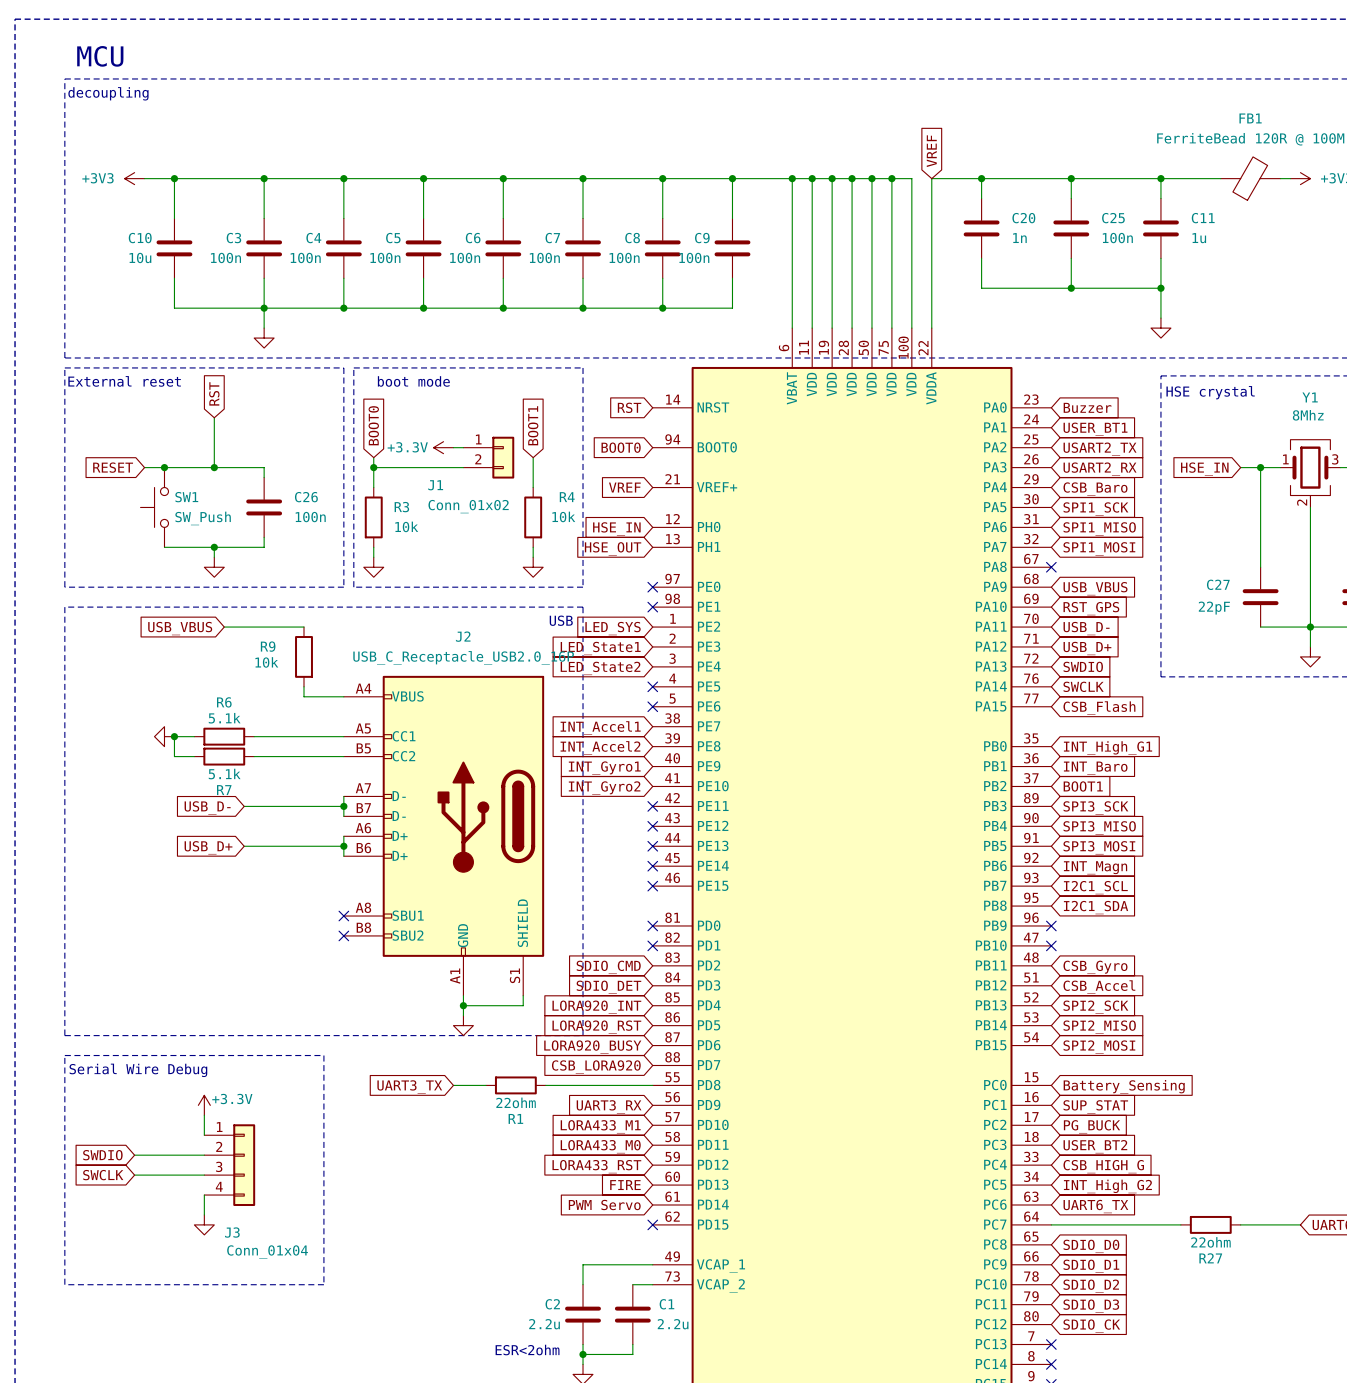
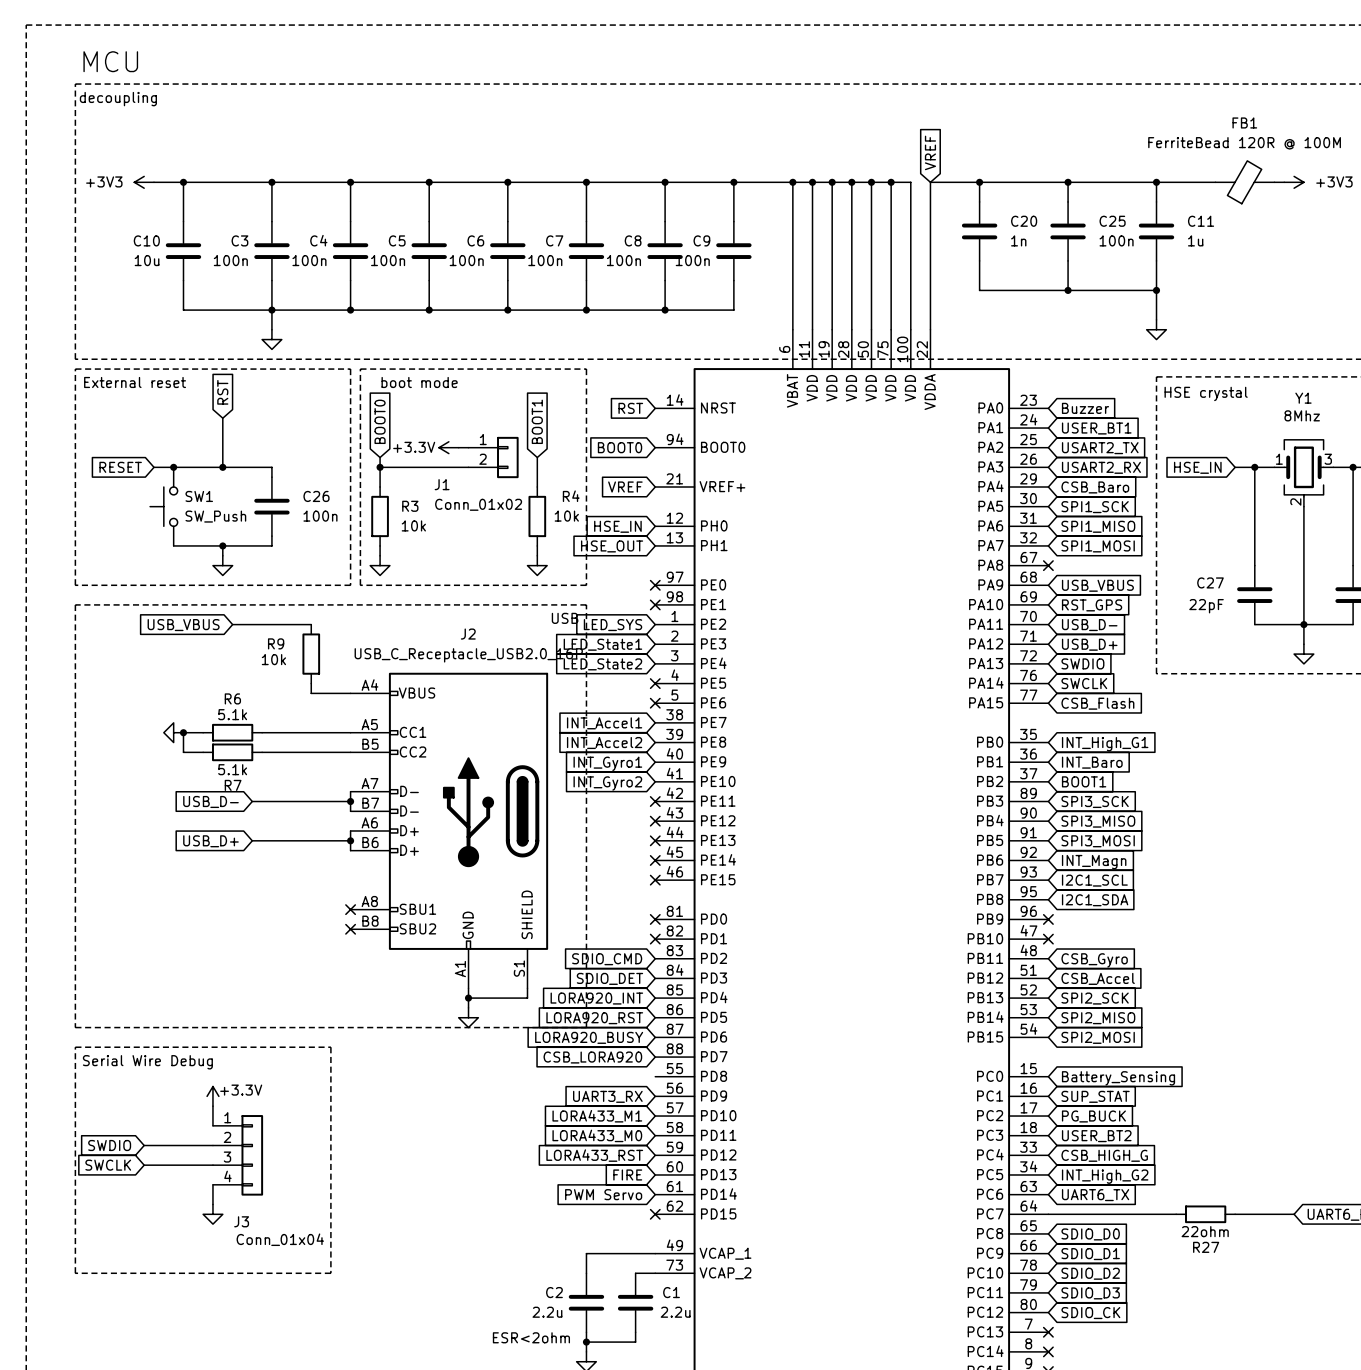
wire: (453, 1085) (485, 1085) -> none
R1: 22ohm (515, 1085) -> none
wire: (545, 1085) (652, 1085) -> none
global label: UART3_TX (409, 1086) -> none

